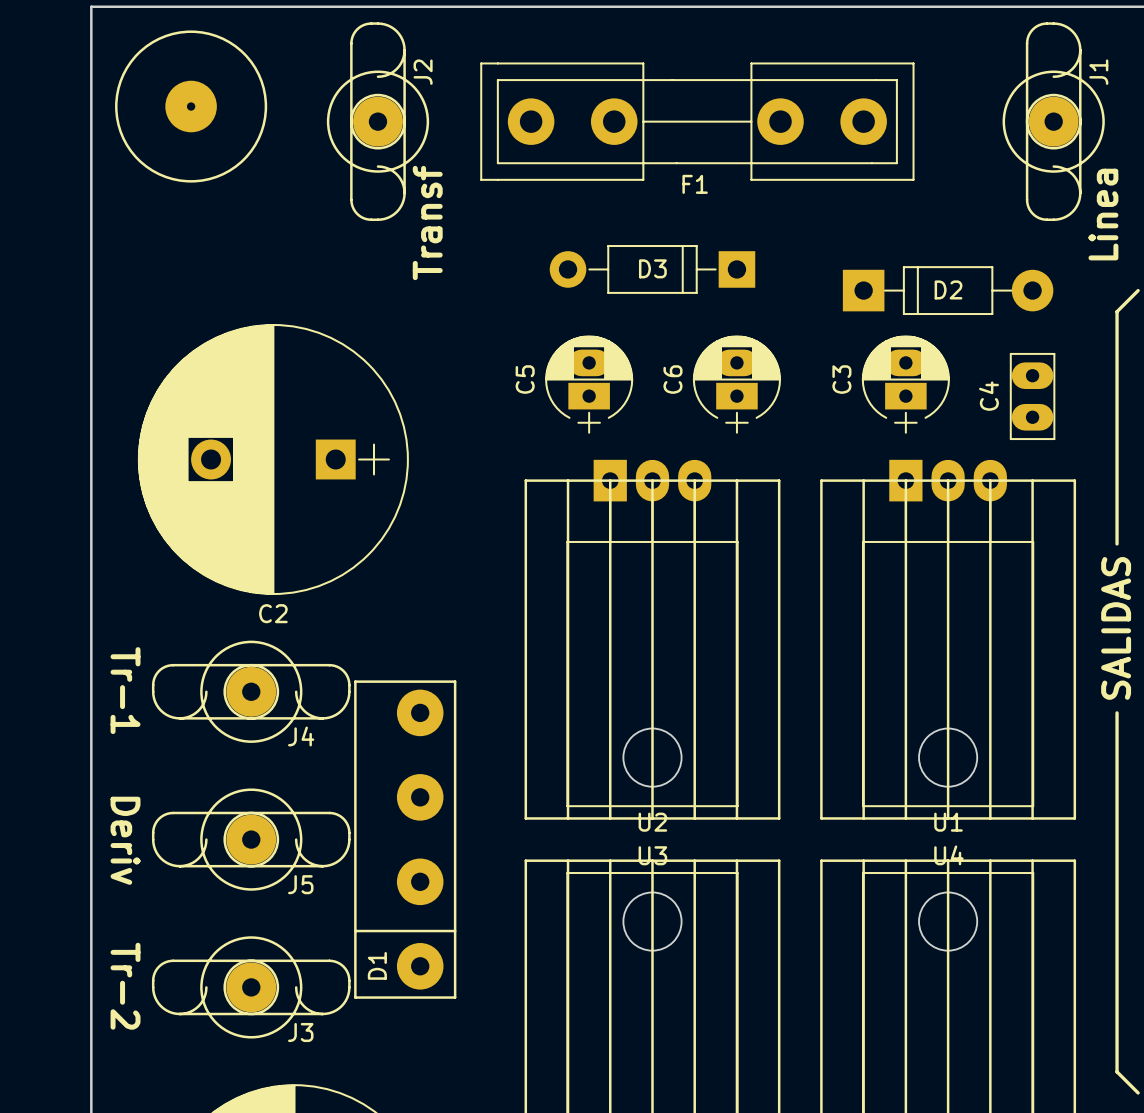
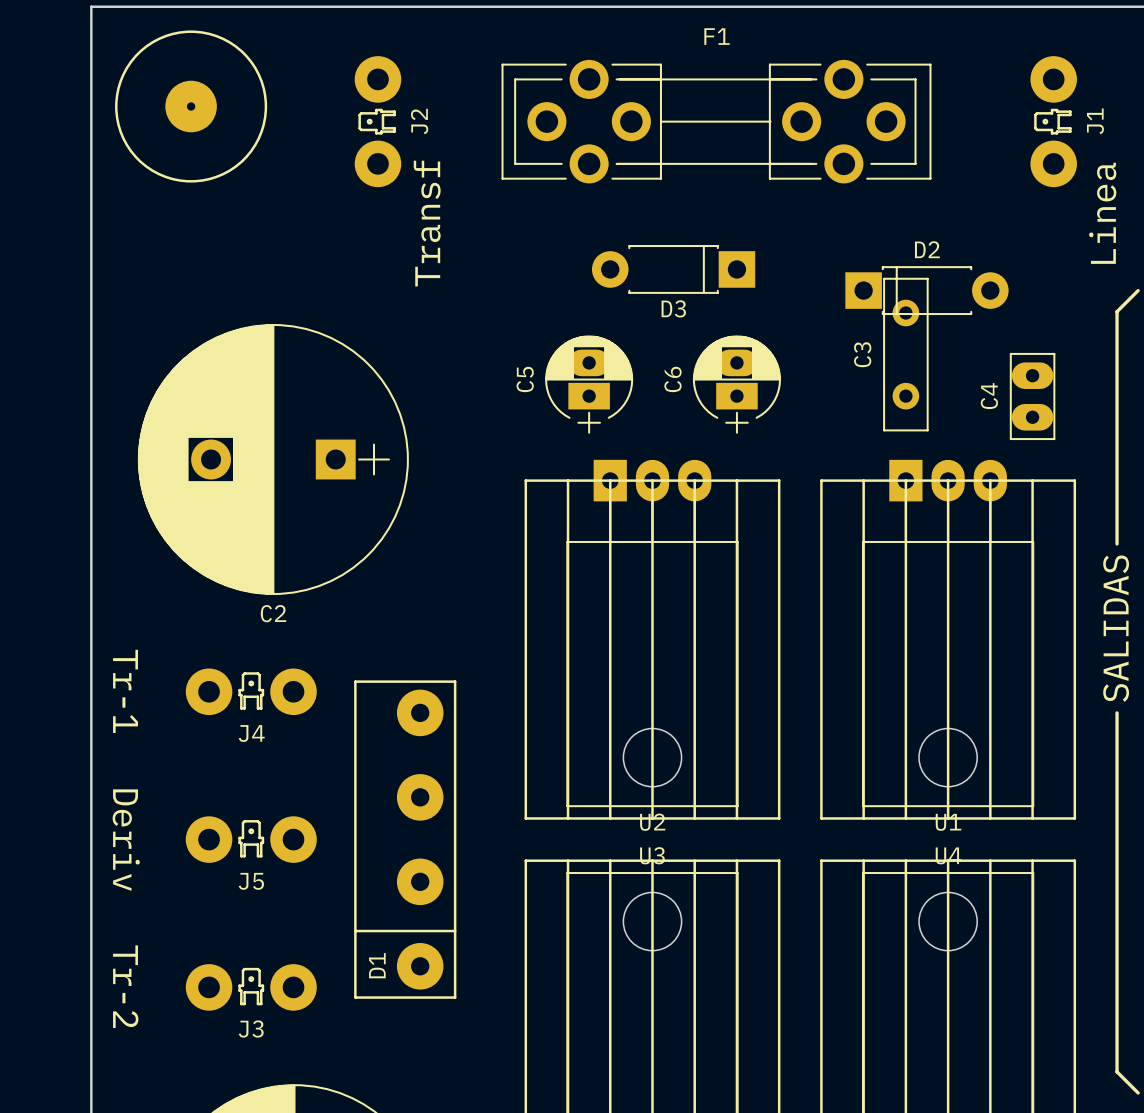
J2 footprint: [326, 22, 430, 221] -> [354, 56, 402, 188]
J1 footprint: [1002, 22, 1105, 221] -> [1030, 56, 1077, 188]
F1 footprint: [480, 62, 915, 181] -> [501, 59, 932, 184]
J2 name position: J2 (423, 72) -> J2 (419, 121)
J1 name position: J1 (1098, 72) -> J1 (1095, 121)
F1 name position: F1 (695, 184) -> F1 (717, 36)
D3 footprint: [549, 245, 756, 294] -> [591, 245, 756, 294]
D2 footprint: [842, 266, 1054, 316] -> [845, 266, 1009, 316]
D3 name position: D3 (652, 268) -> D3 (673, 308)
D2 name position: D2 (948, 289) -> D2 (927, 249)
C3 footprint: [861, 335, 950, 434] -> [883, 277, 929, 432]
J4 footprint: [151, 640, 351, 743] -> [185, 668, 317, 716]
J4 name position: J4 (301, 736) -> J4 (251, 733)
J5 footprint: [151, 788, 351, 891] -> [185, 816, 317, 863]
J5 name position: J5 (300, 884) -> J5 (251, 881)
J3 footprint: [151, 936, 351, 1039] -> [185, 964, 317, 1011]
J3 name position: J3 (300, 1032) -> J3 (251, 1029)

